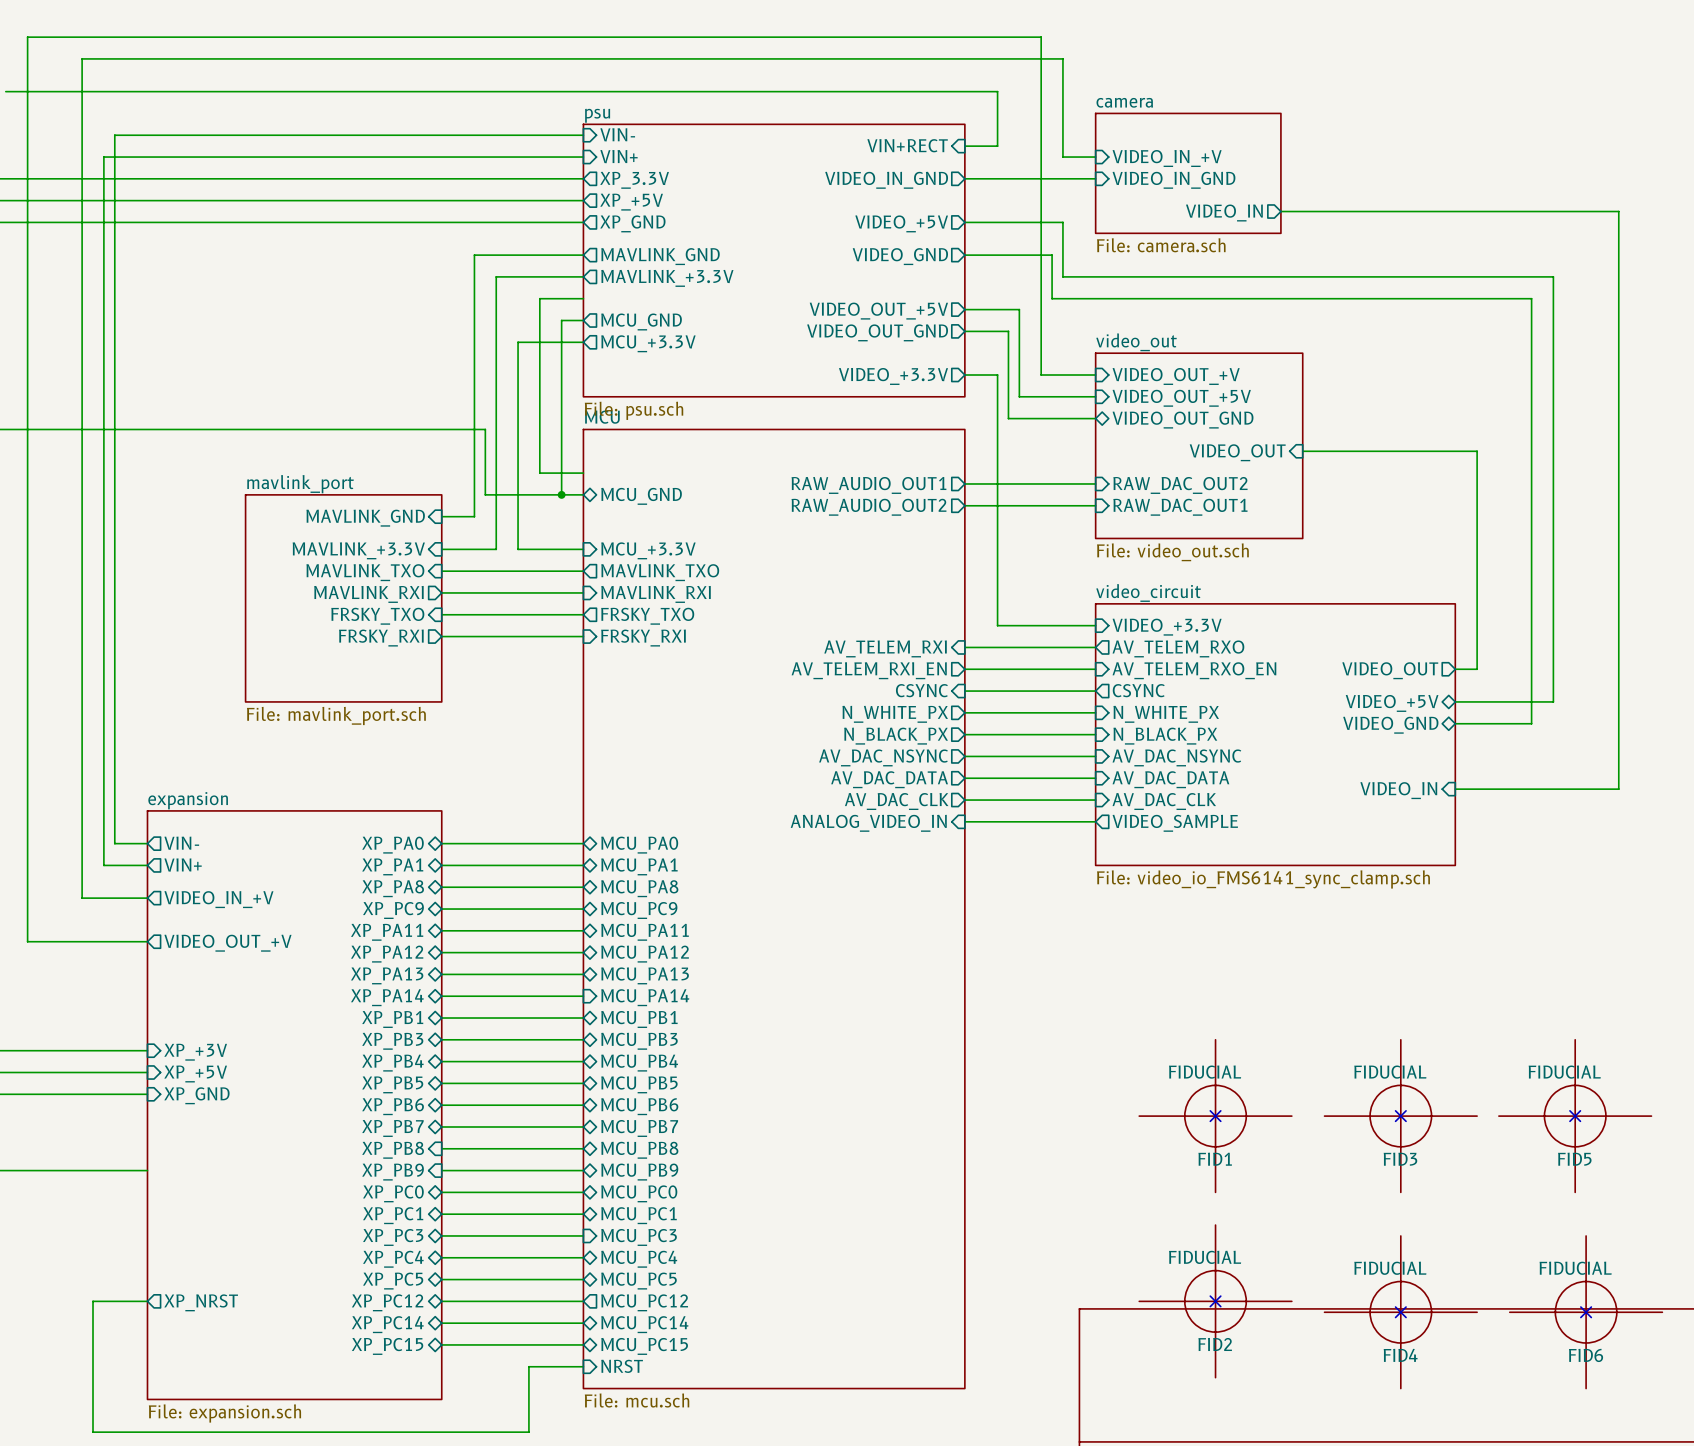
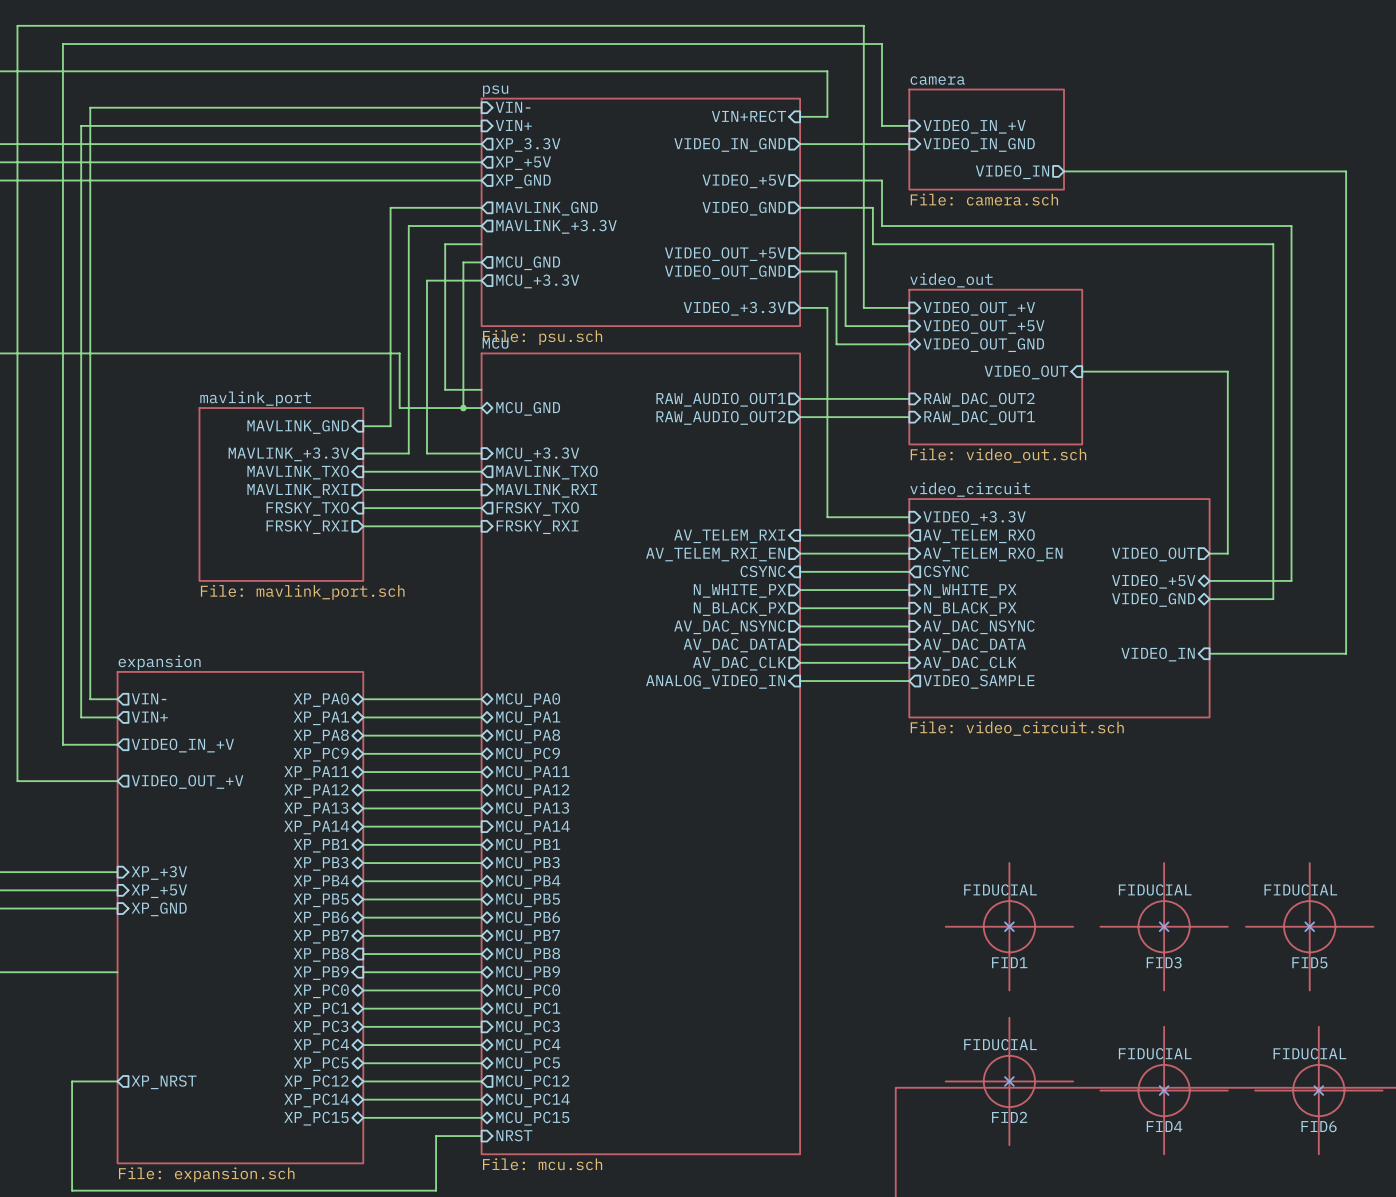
sheet video_circuit value: File: video_io_FMS6141_sync_clamp.sch (1263, 879) -> File: video_circuit.sch (1017, 728)

